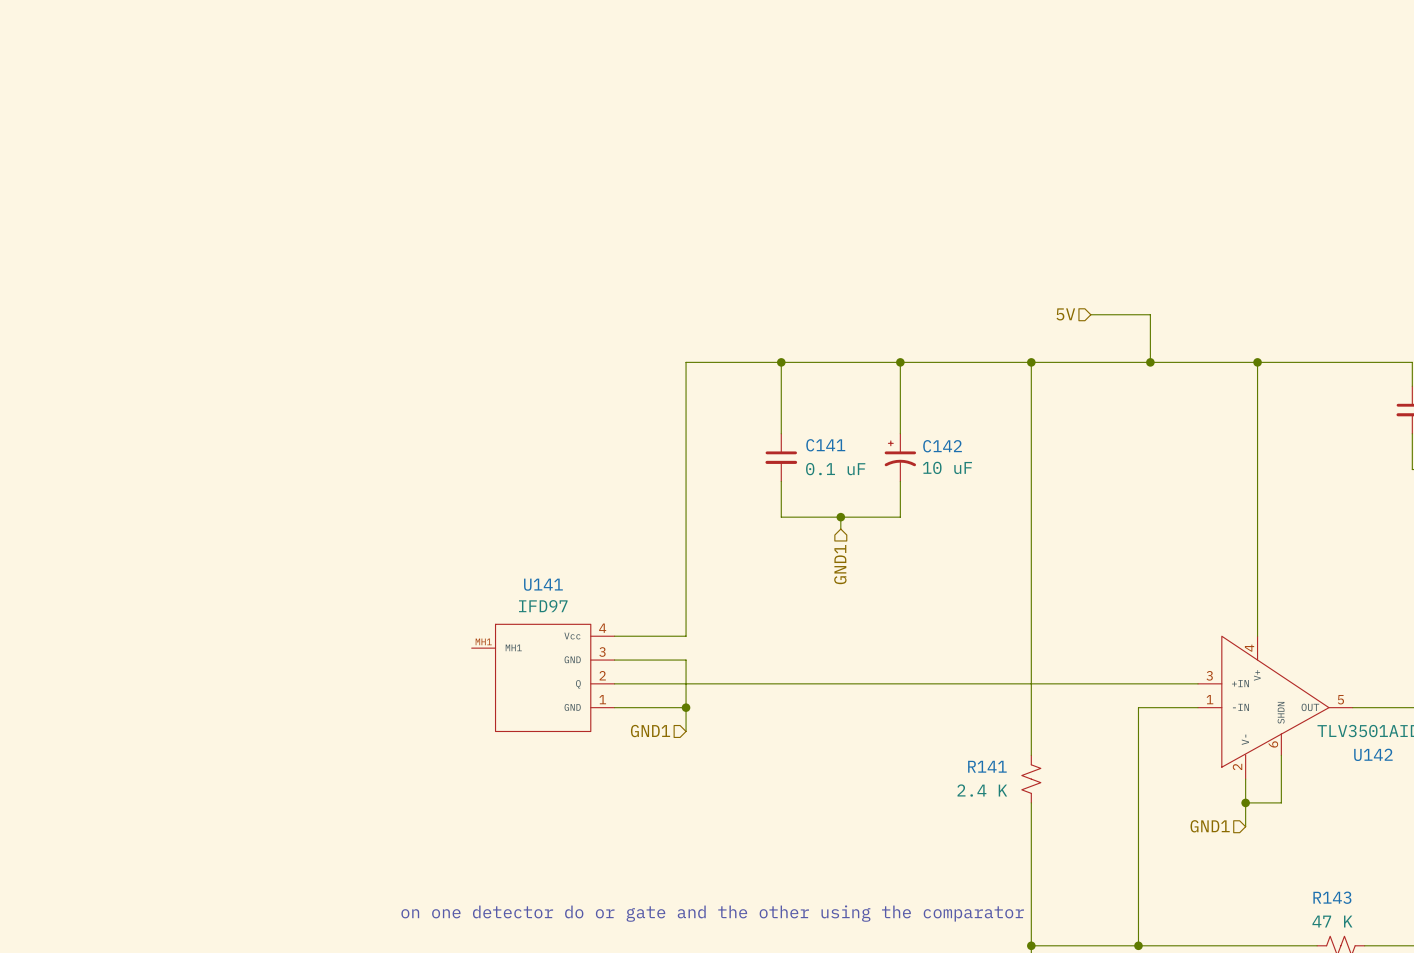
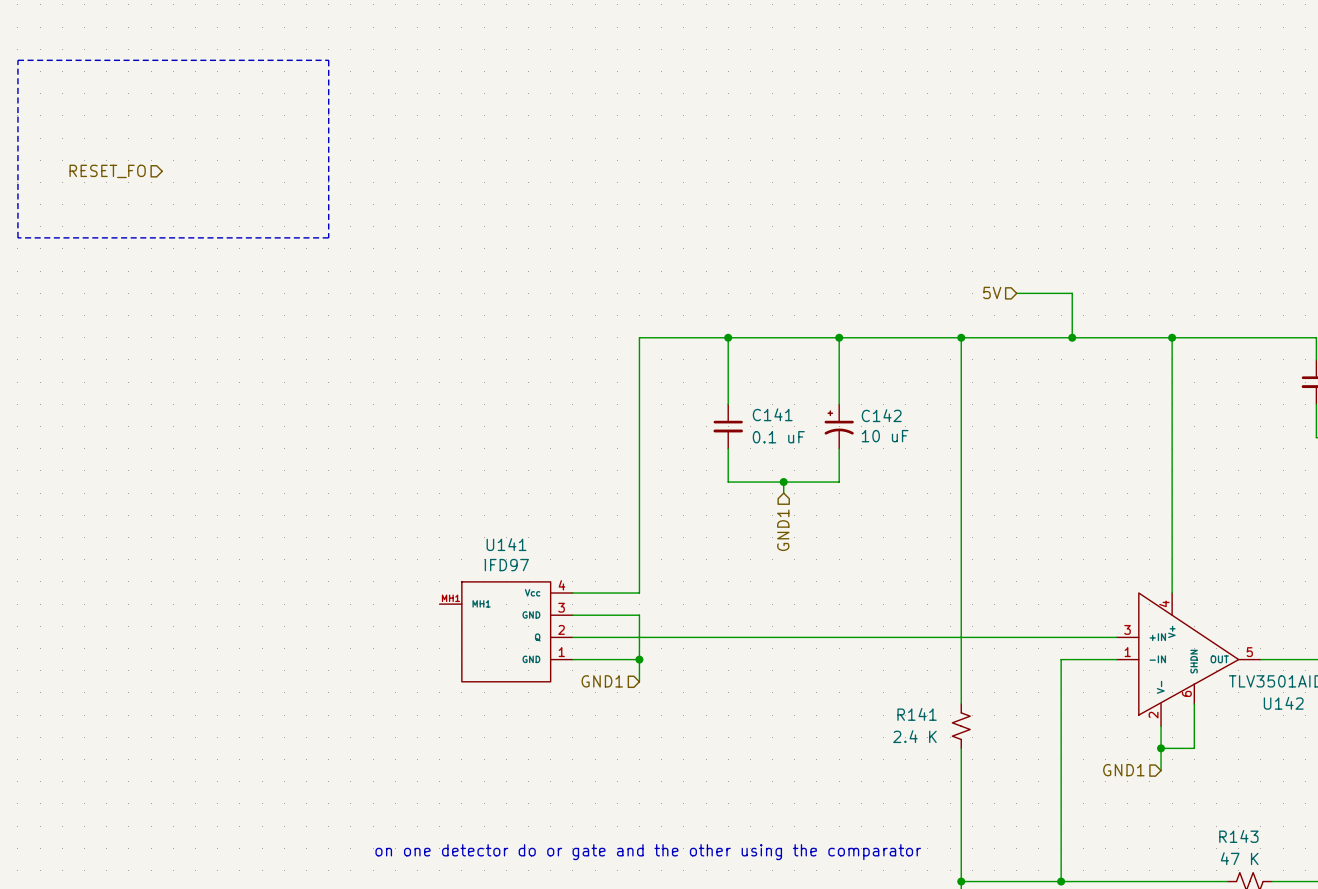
line: none -> (17, 60) (328, 60) (328, 237) (17, 237) (17, 60)
hierarchical label: none -> RESET_FO (107, 171)

